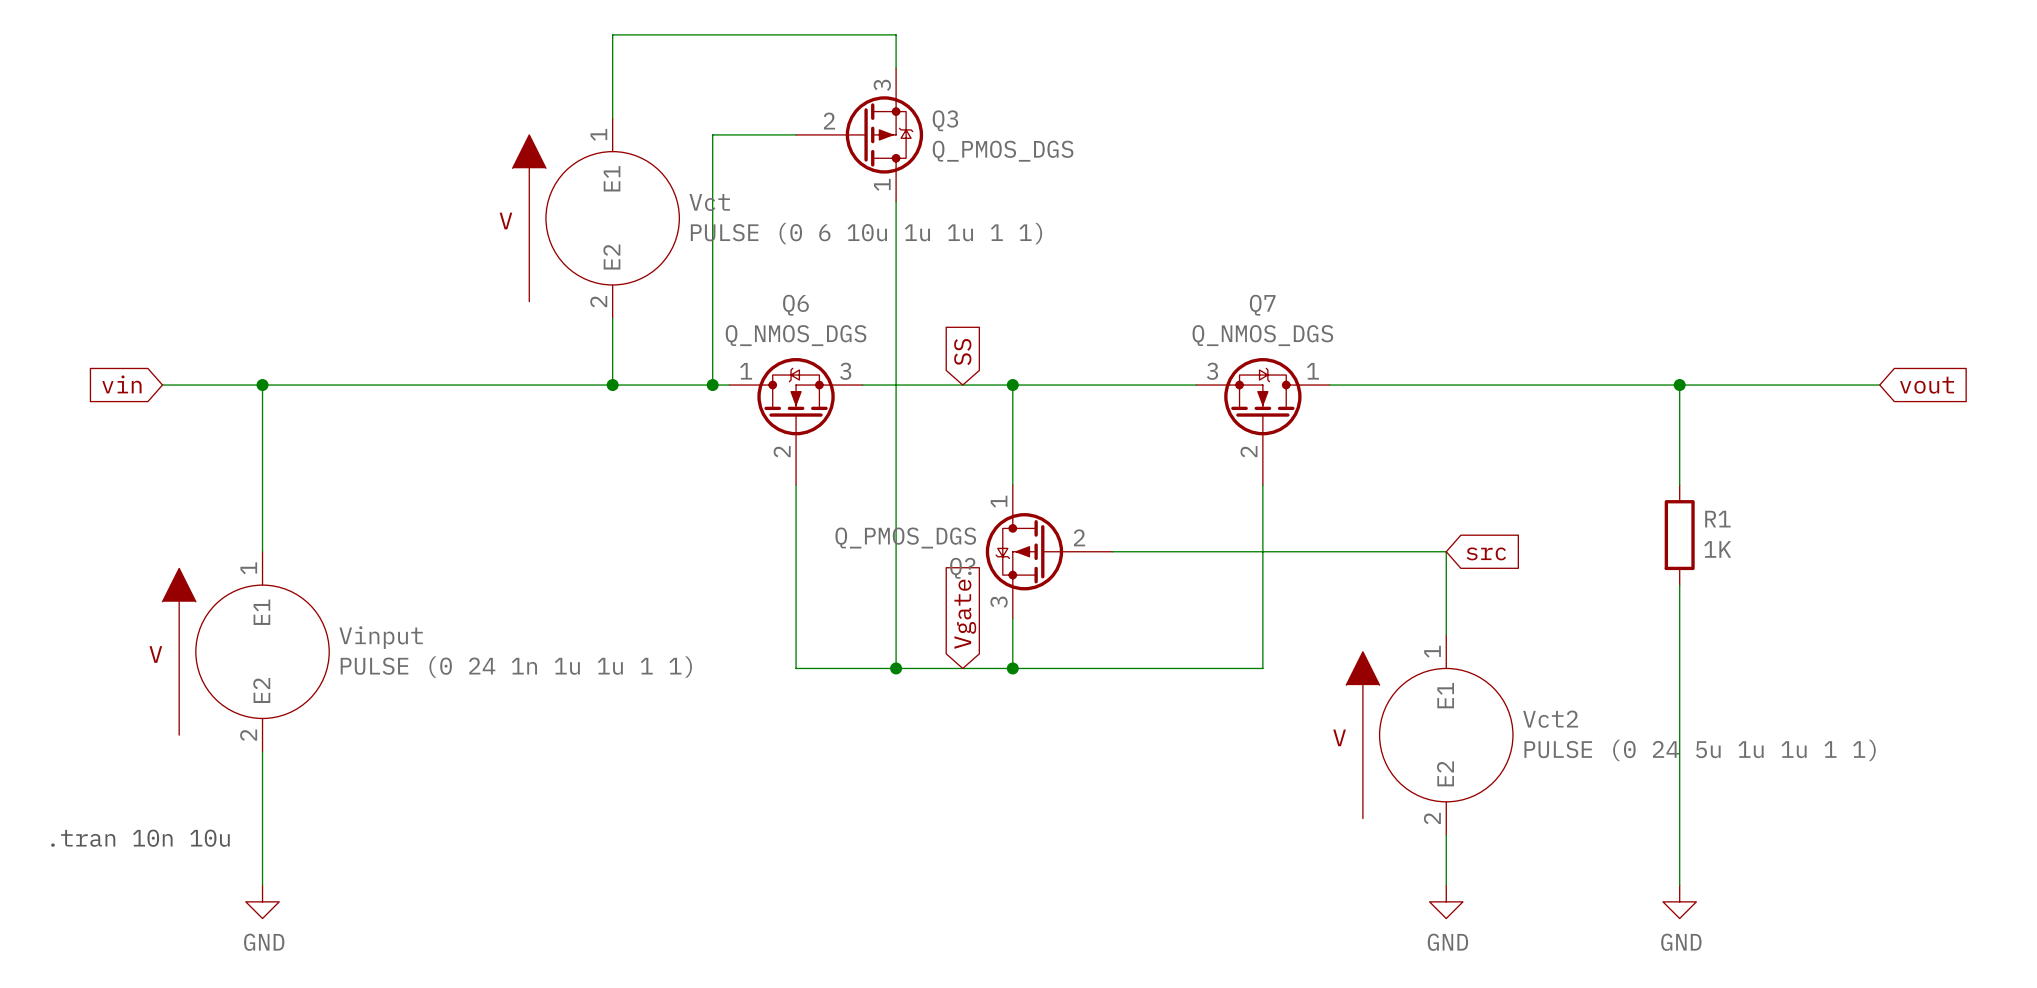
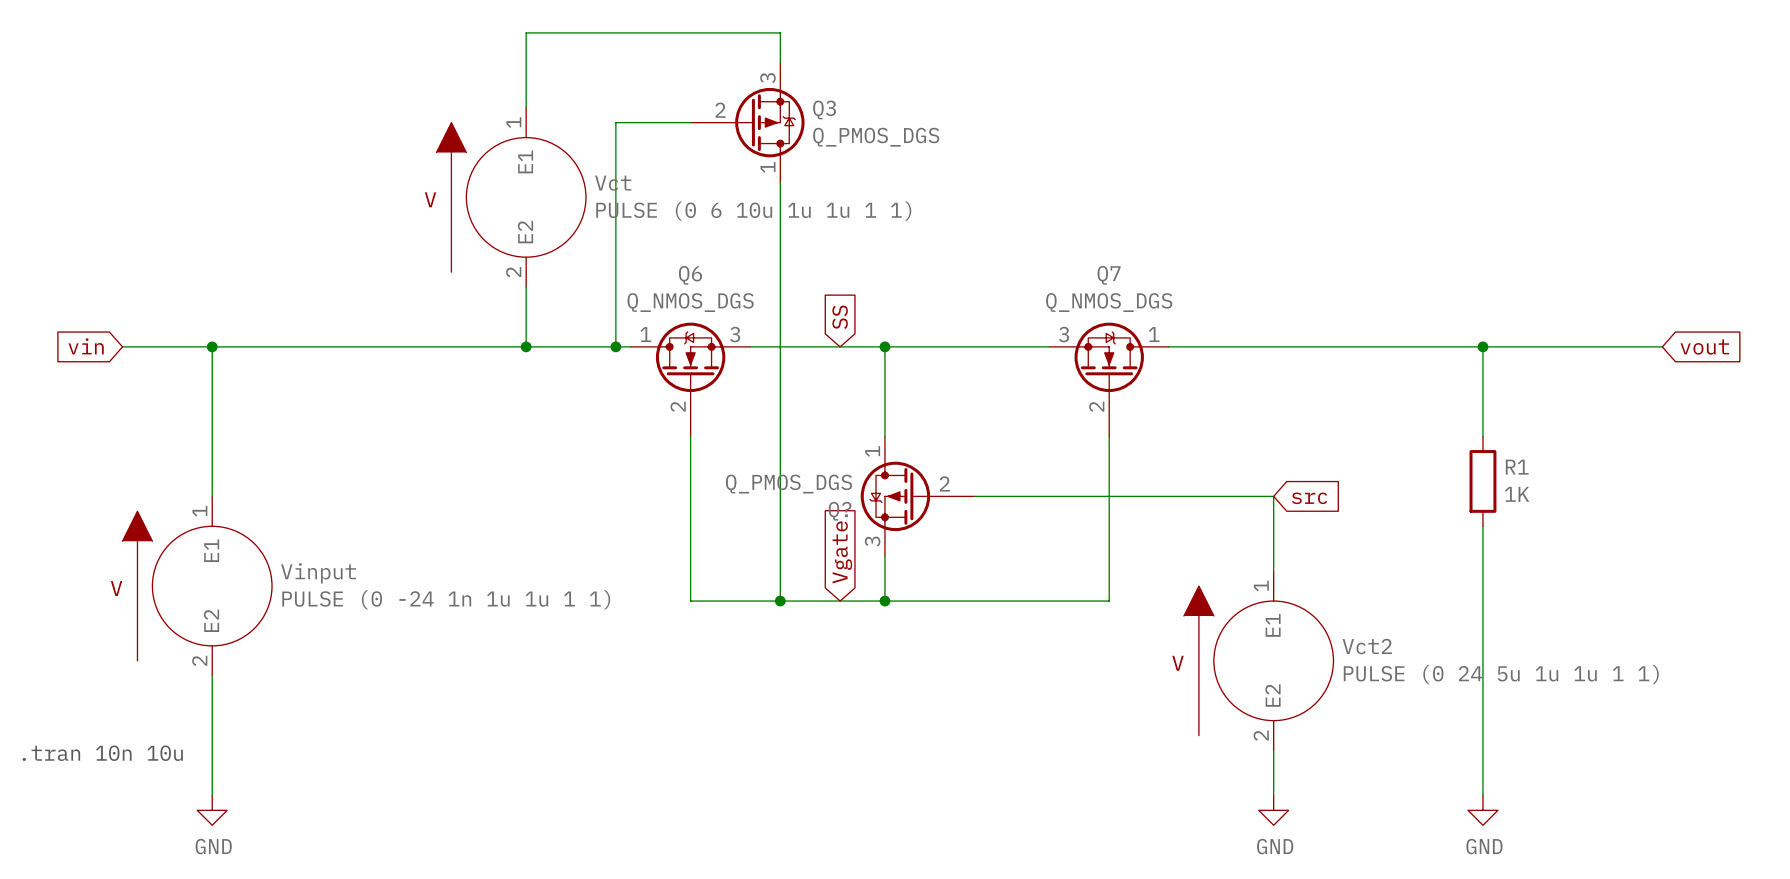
Vinput value: PULSE (0 24 1n 1u 1u 1 1) (516, 667) -> PULSE (0 -24 1n 1u 1u 1 1) (446, 599)

